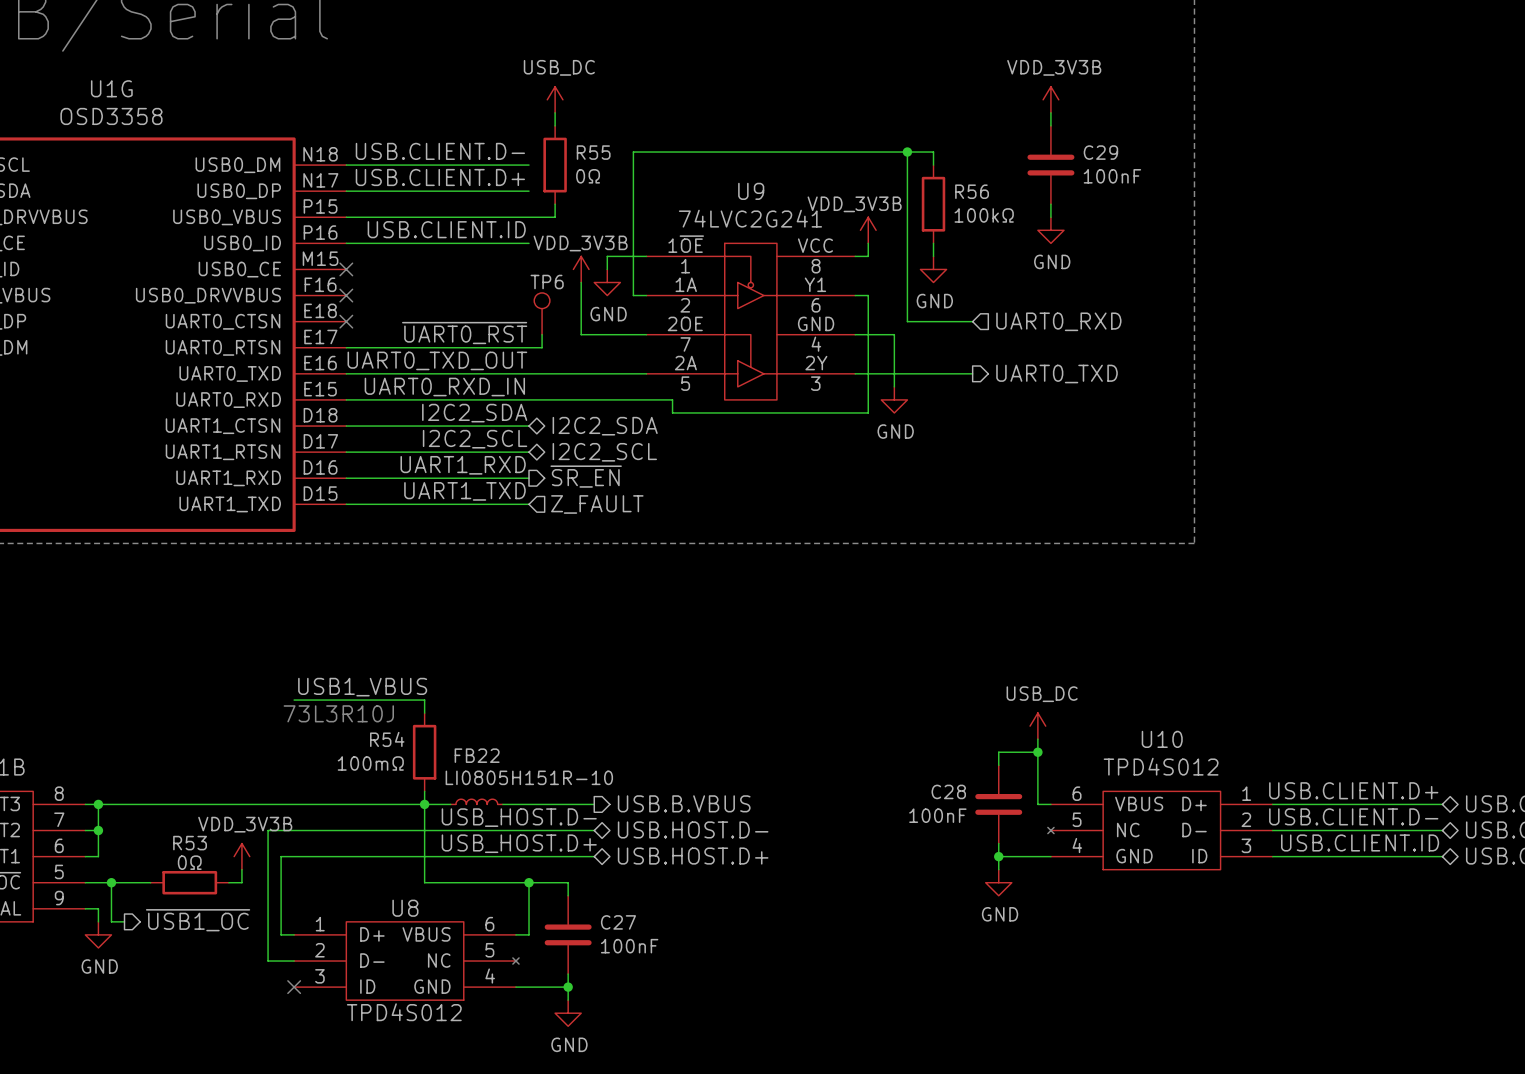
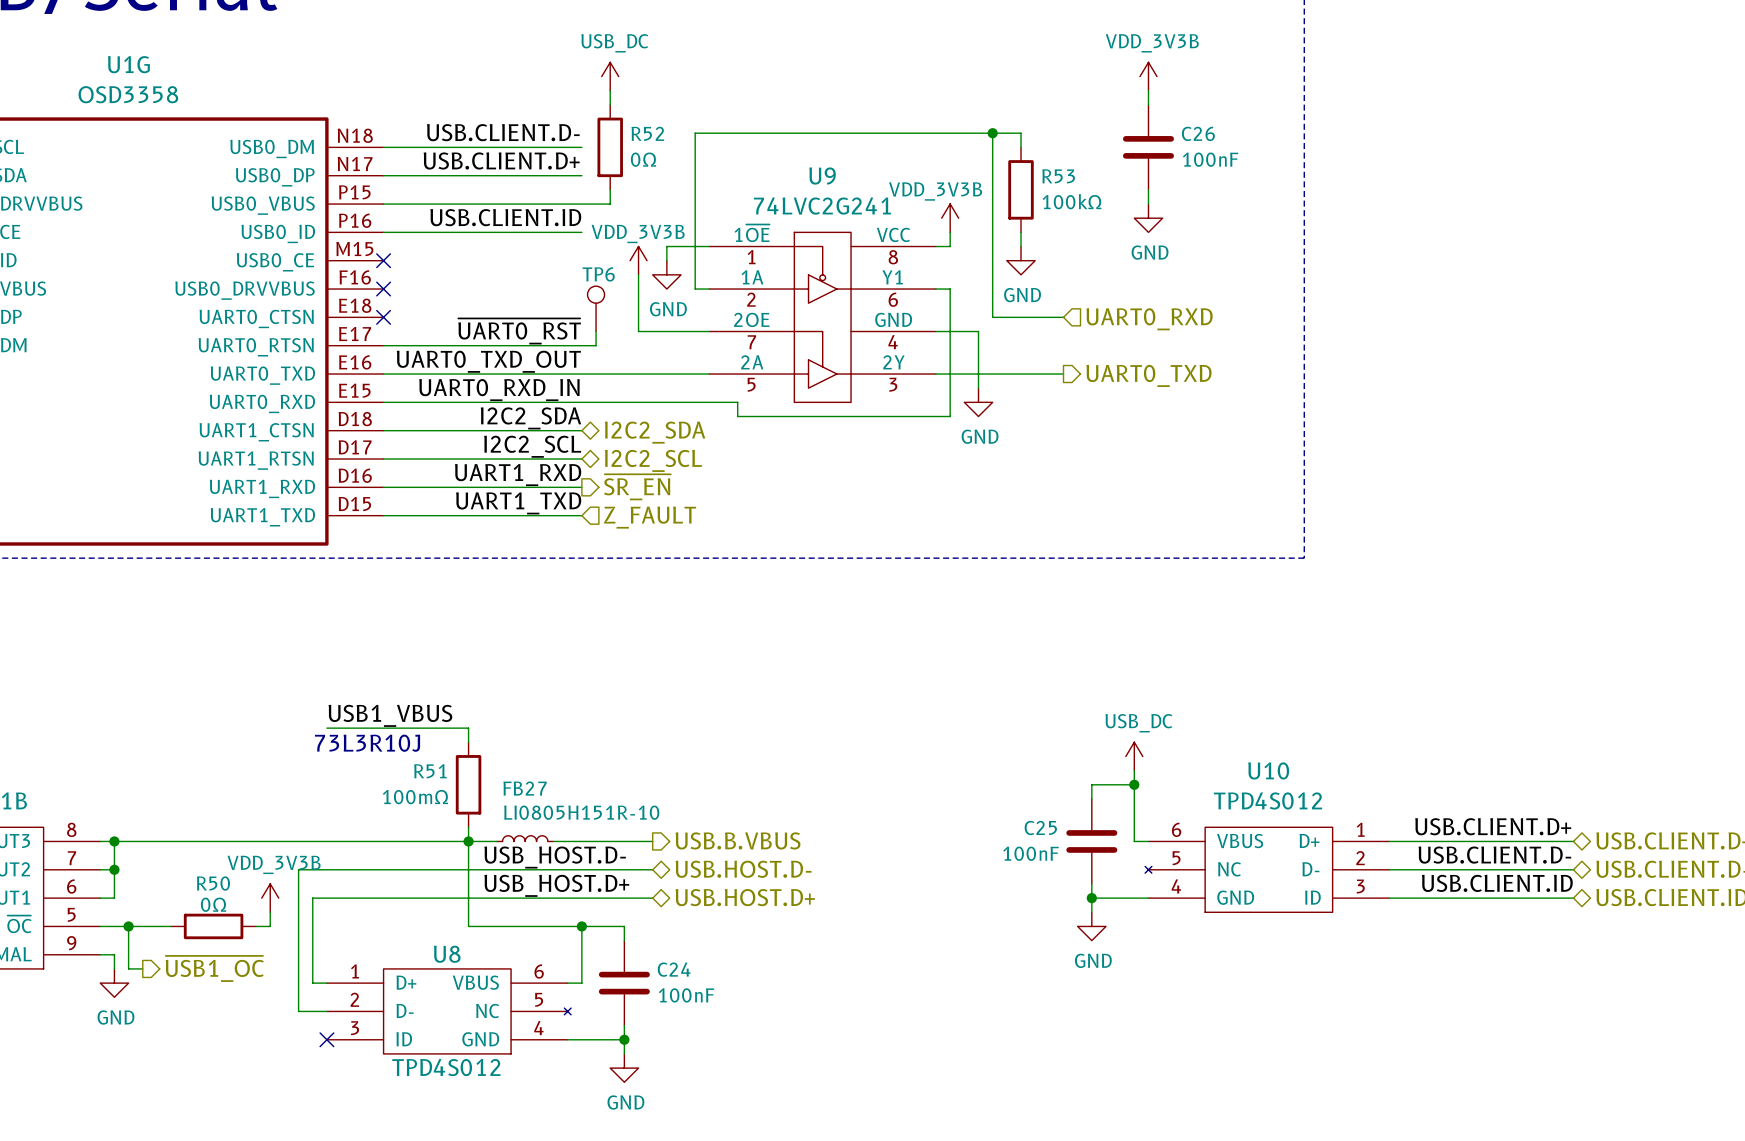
R55 name: R55 (593, 152) -> R52 (647, 133)
C29 name: C29 (1100, 152) -> C26 (1198, 133)
R56 name: R56 (972, 191) -> R53 (1058, 176)
R54 name: R54 (387, 739) -> R51 (430, 771)
FB22 name: FB22 (477, 755) -> FB27 (525, 788)
C28 name: C28 (948, 791) -> C25 (1040, 827)
R53 name: R53 (190, 843) -> R50 (213, 883)
C27 name: C27 (618, 922) -> C24 (674, 969)

